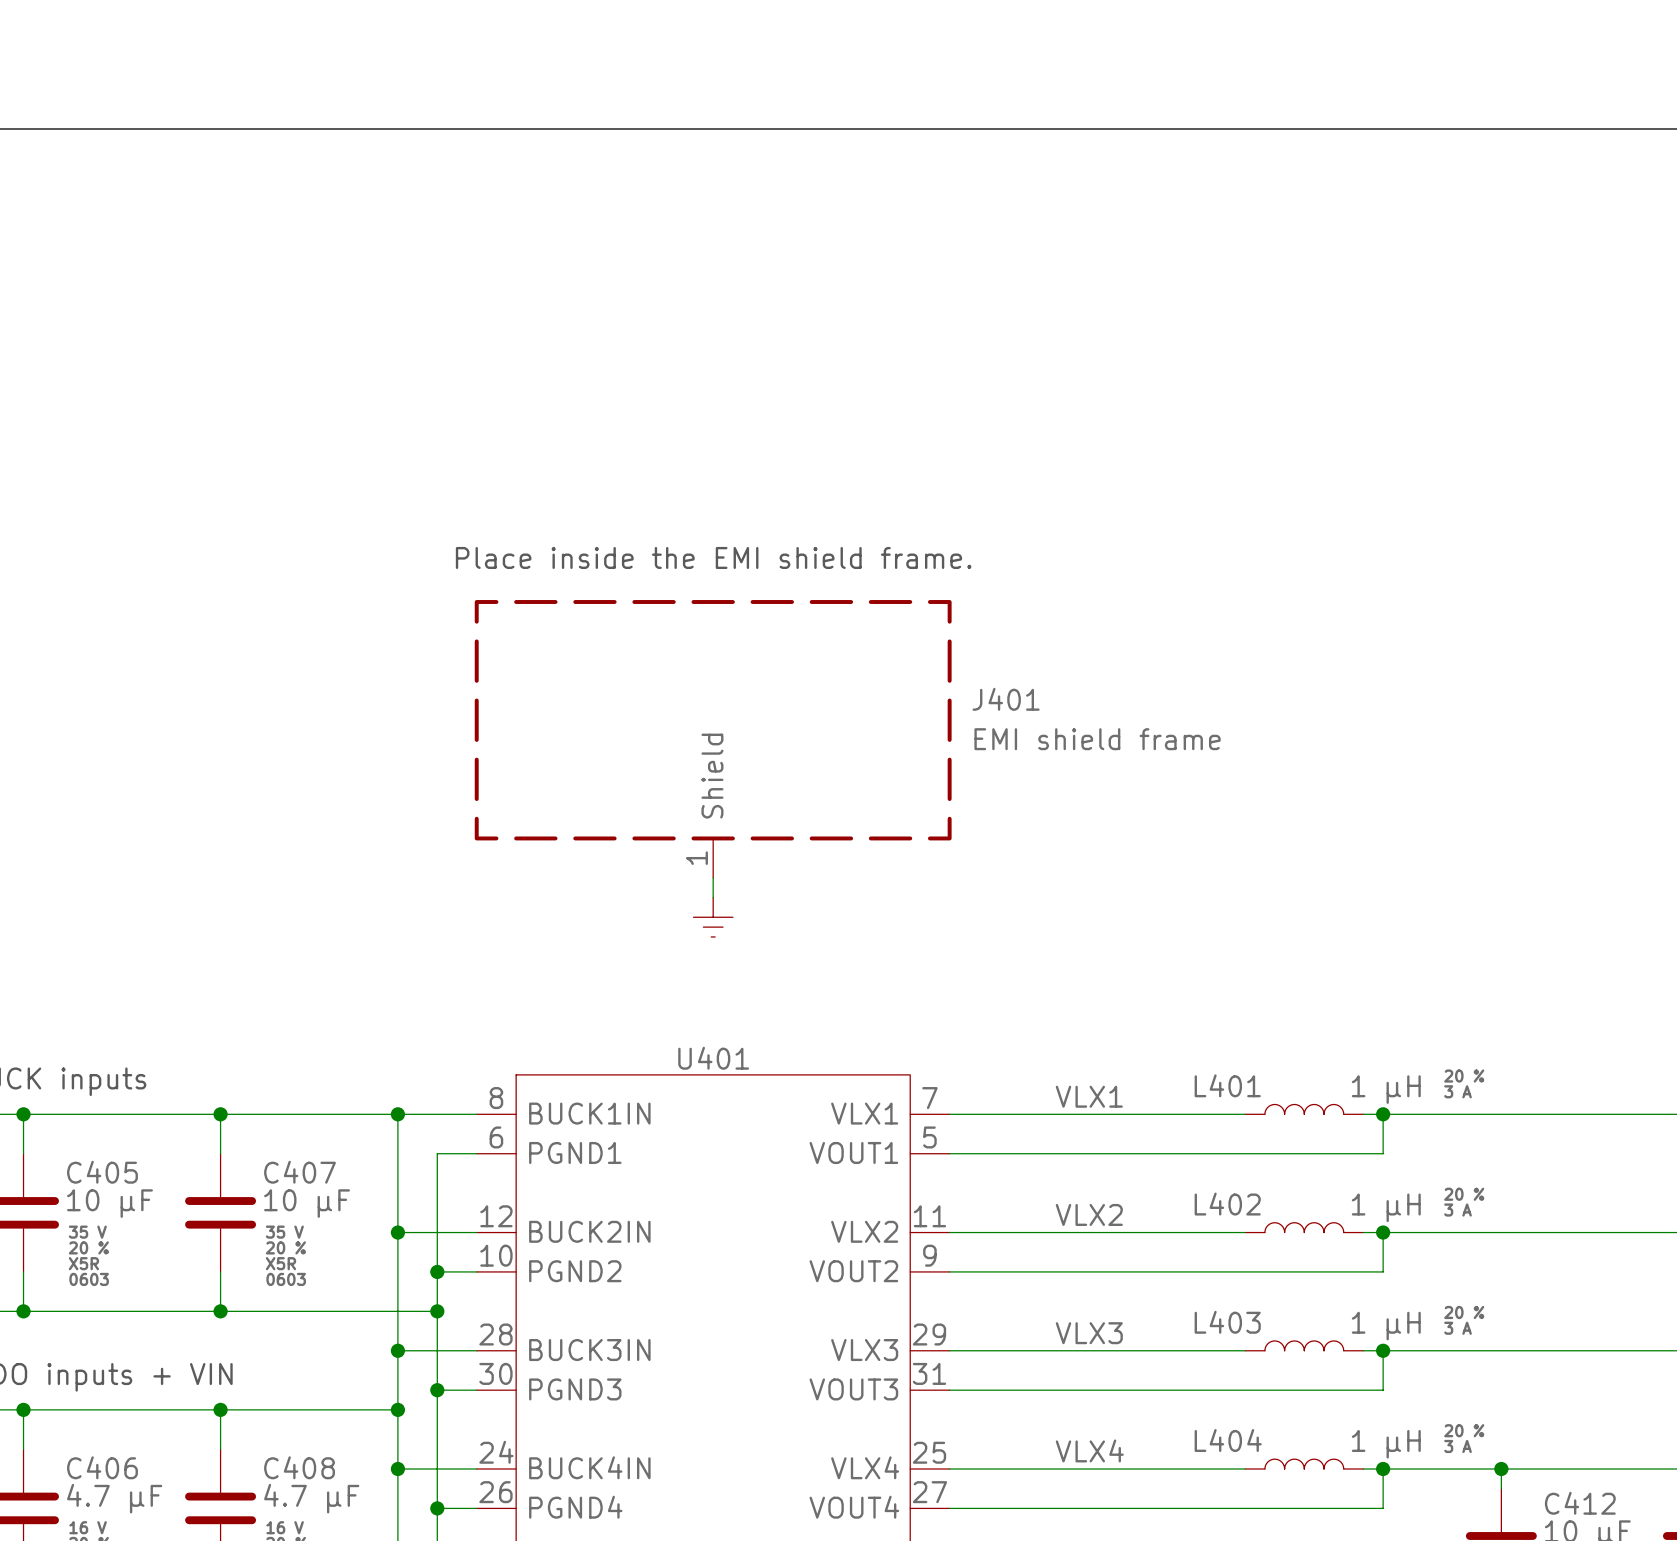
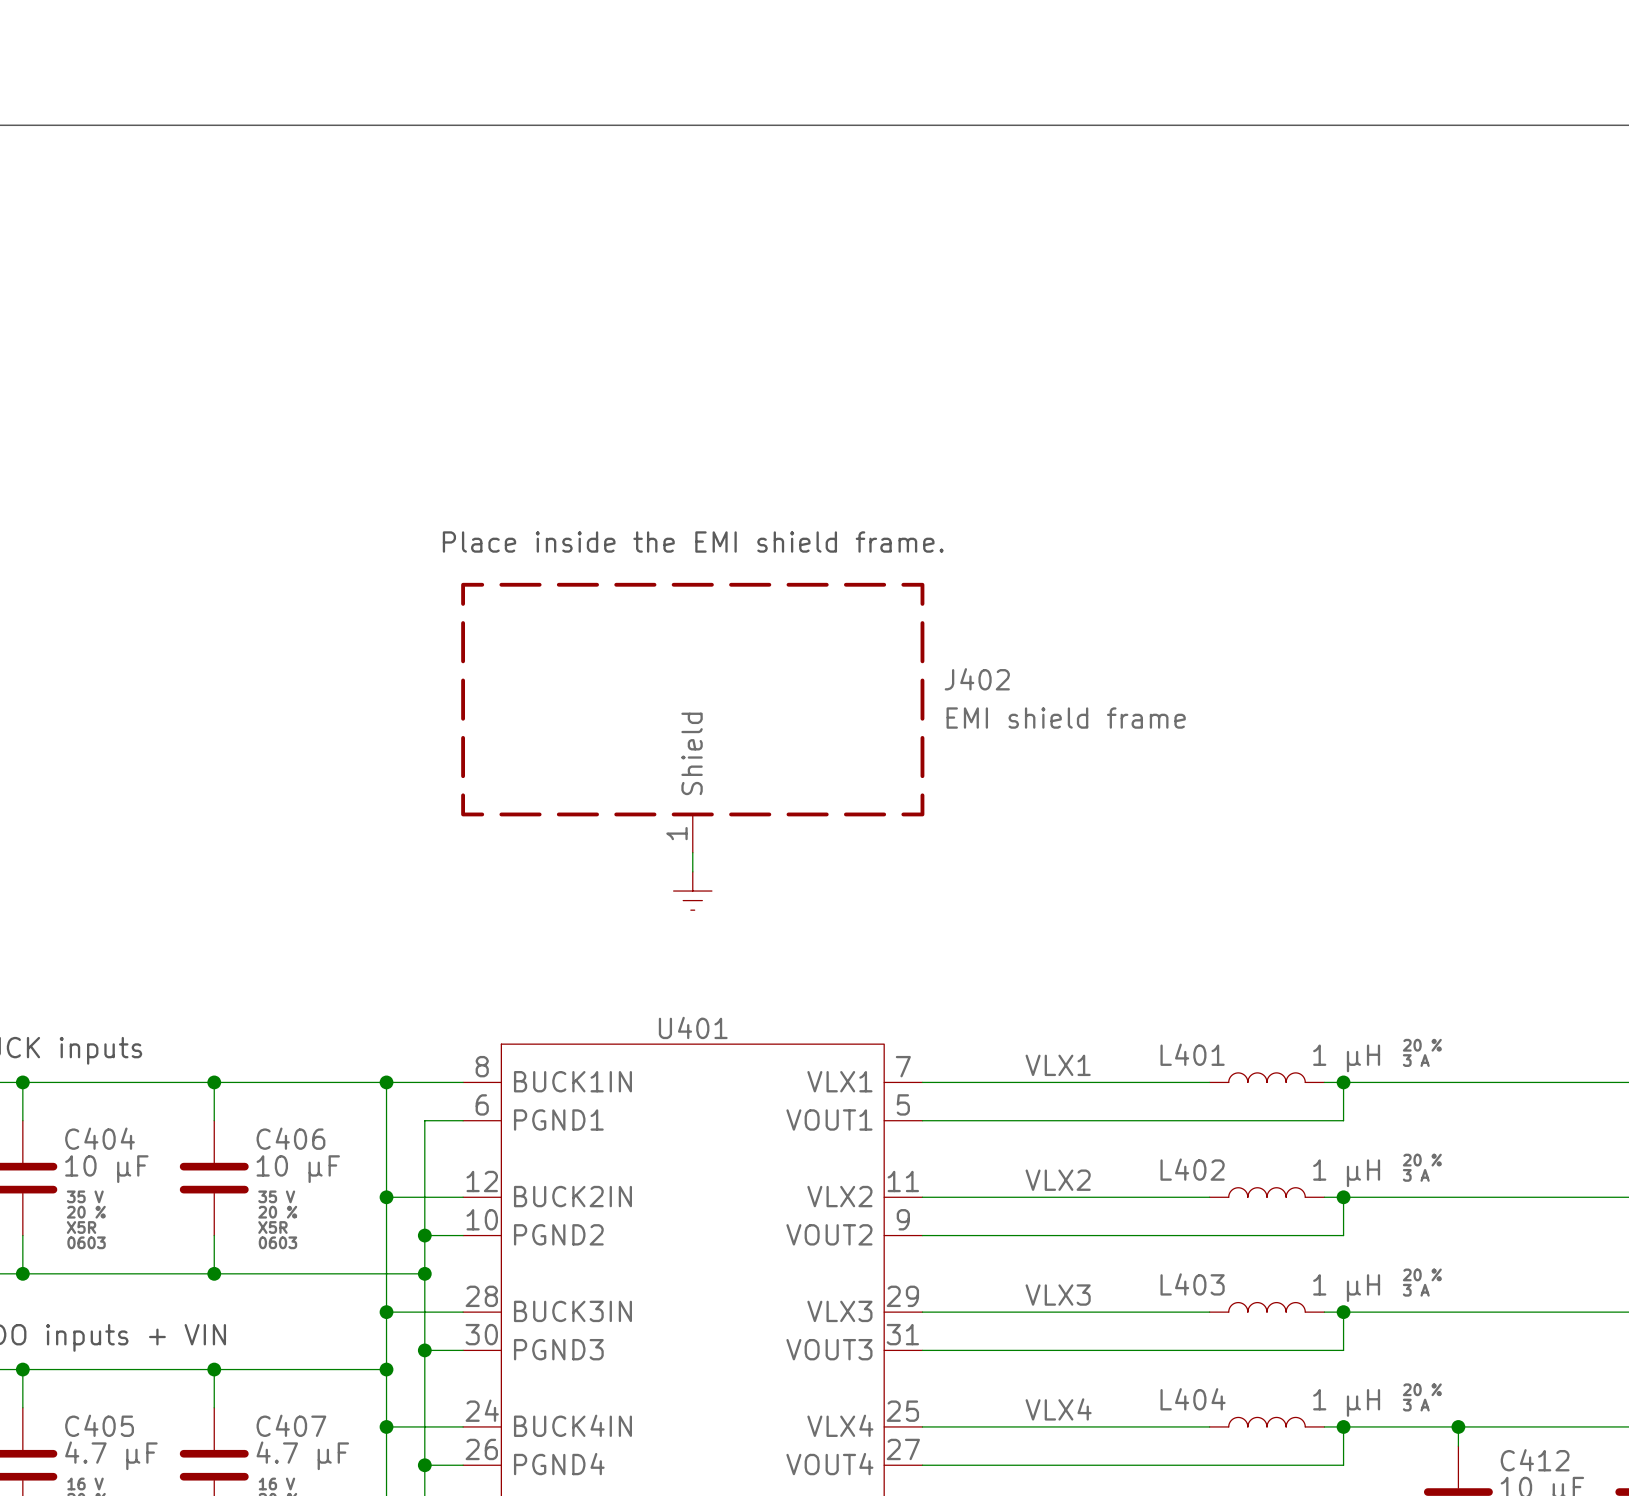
J401 name: J401 (1006, 699) -> J402 (977, 679)
C405 name: C405 (102, 1172) -> C404 (100, 1138)
C407 name: C407 (300, 1172) -> C406 (290, 1138)
C406 name: C406 (102, 1467) -> C405 (99, 1425)
C408 name: C408 (299, 1467) -> C407 (291, 1425)

